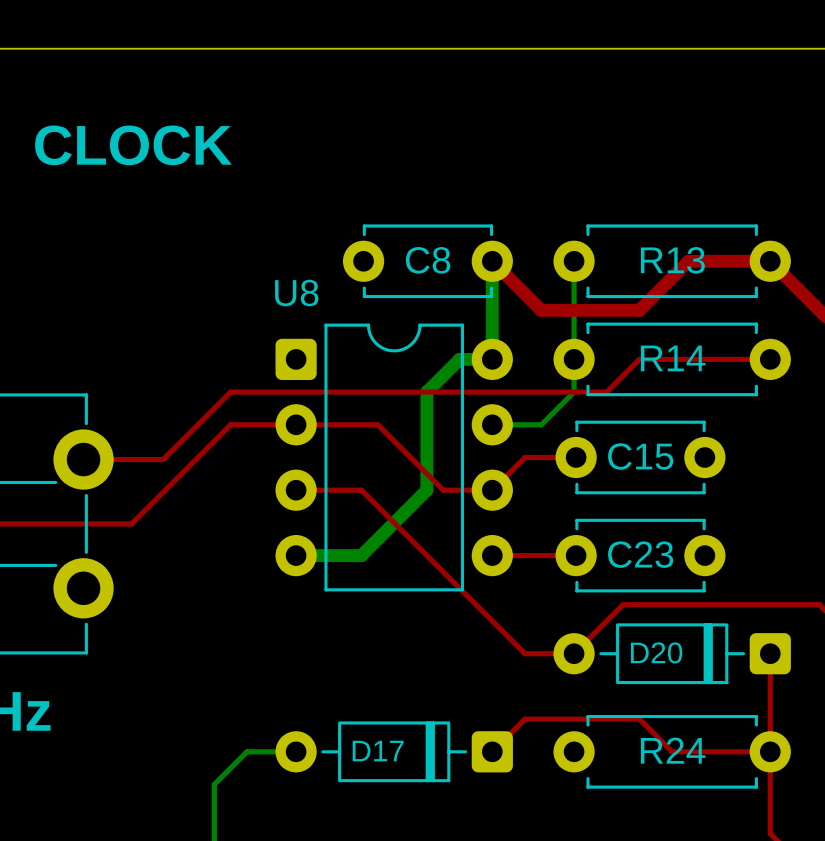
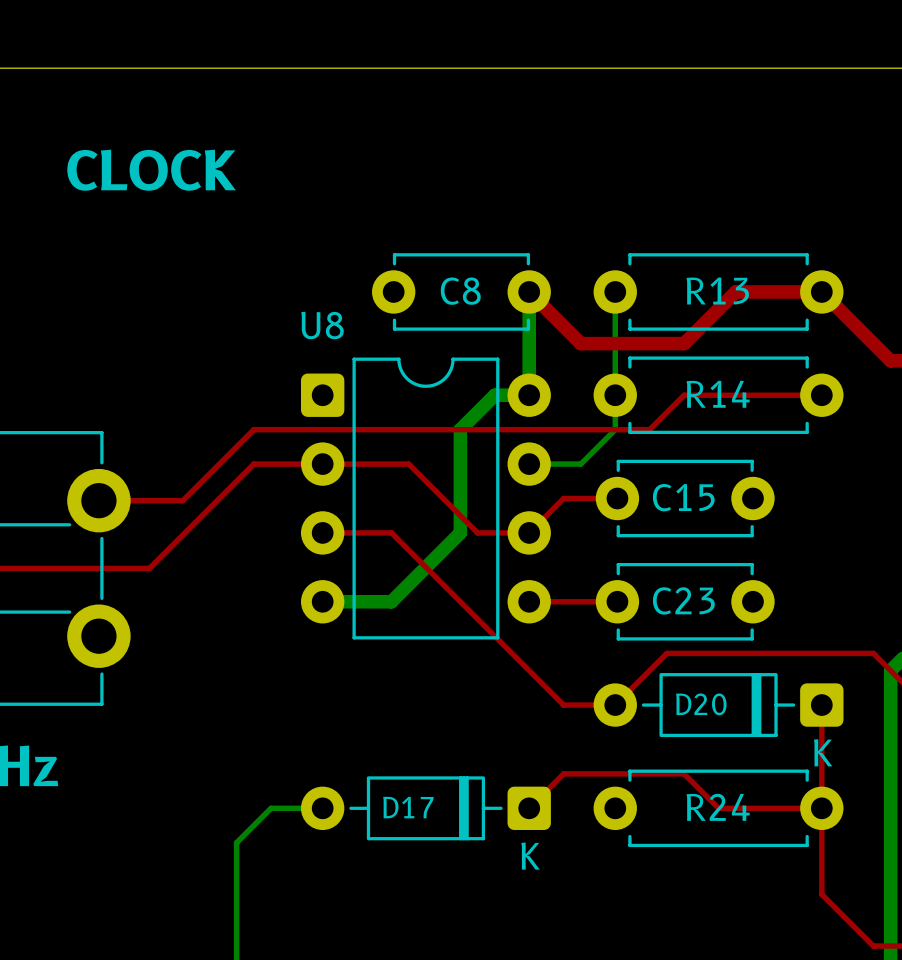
D20 text: none -> K (823, 752)
D17 text: none -> K (530, 856)

